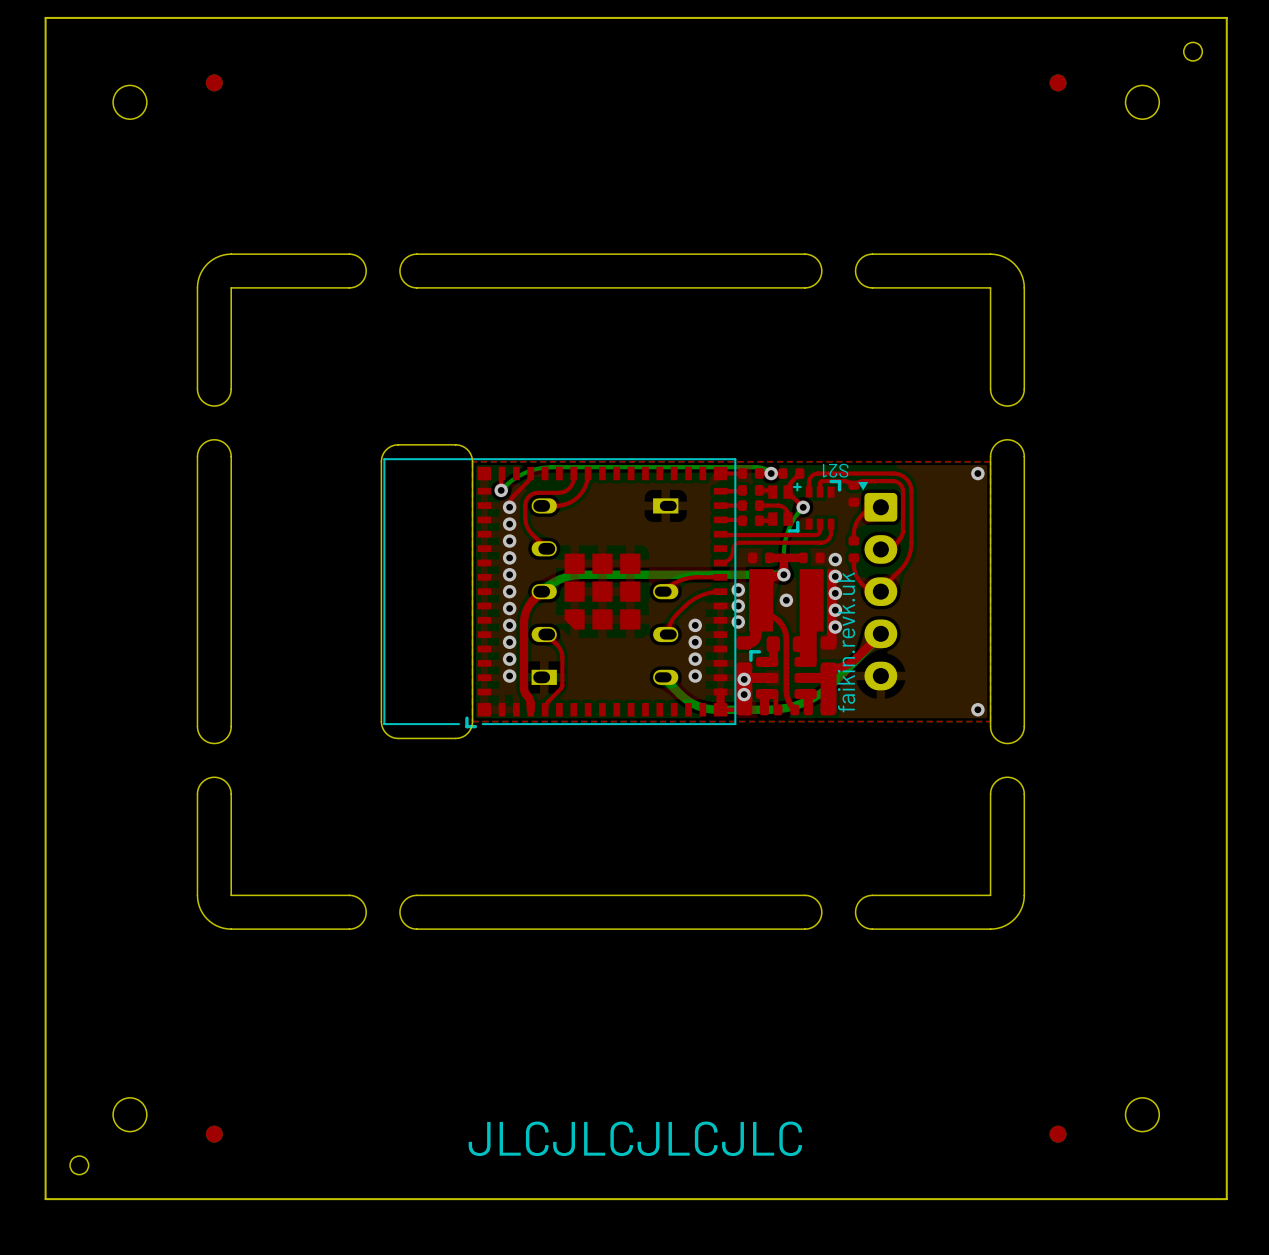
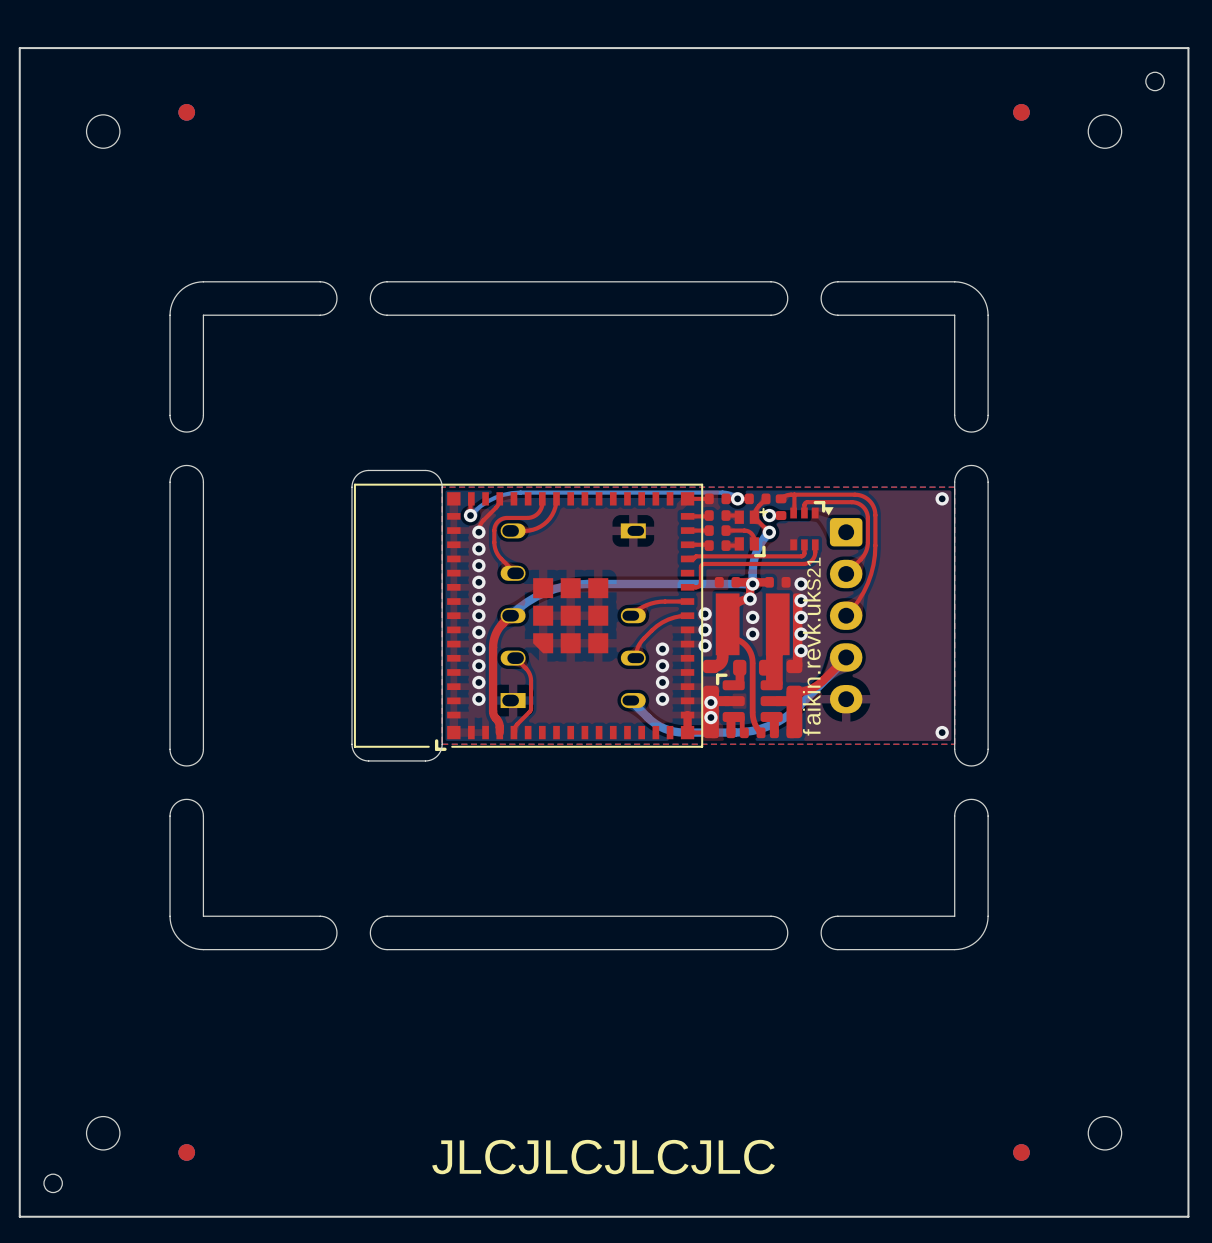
top track: none -> (794, 494) (794, 512)
text rotation: 0° (835, 470) -> 90° clockwise (813, 574)
text position: S21 (835, 470) -> S21 (813, 574)
part: none -> (781, 507)
top track: (863, 481) (894, 481) (902, 487) (903, 532) (900, 538) (892, 546) -> none
top track: (864, 481) (853, 485) (845, 481) (821, 481) (820, 492) -> none
top track: none -> (804, 514) (804, 504) (807, 502) (853, 502) (864, 508) (867, 518) (866, 549) (862, 557) (846, 573)
via: none -> (769, 515)
top track: (809, 492) (809, 478) (816, 473) (895, 473) (907, 480) (911, 491) (910, 550) (902, 567) (880, 589) -> none
part: (853, 493) -> none
part position: (823, 504) -> (807, 525)
bottom track: (803, 507) (794, 517) (786, 534) (784, 547) (783, 574) (574, 575) (560, 579) (541, 591) -> (769, 532) (760, 544) (754, 557) (752, 583) (576, 584) (545, 592) (527, 602) (510, 615)
top track: (880, 507) (869, 509) (859, 517) (854, 528) (853, 541) -> none
top track: none -> (804, 544) (804, 554) (801, 556) (696, 556) (693, 558) (687, 558)
top track: (820, 524) (819, 531) (815, 535) (721, 535) -> none
top track: (831, 524) (830, 536) (824, 542) (738, 542) (733, 546) (729, 559) (720, 562) -> (815, 544) (814, 557) (806, 563) (703, 564) (700, 566) (699, 585) (687, 587)
part: (853, 549) -> none
top track: (853, 557) (854, 570) (859, 581) (869, 588) (880, 591) -> (781, 498) (789, 494) (857, 494) (865, 497) (872, 504) (875, 515) (873, 564) (863, 592) (846, 615)
via: none -> (752, 583)
via: none -> (752, 617)
via: (786, 600) -> none
via: none -> (752, 634)

